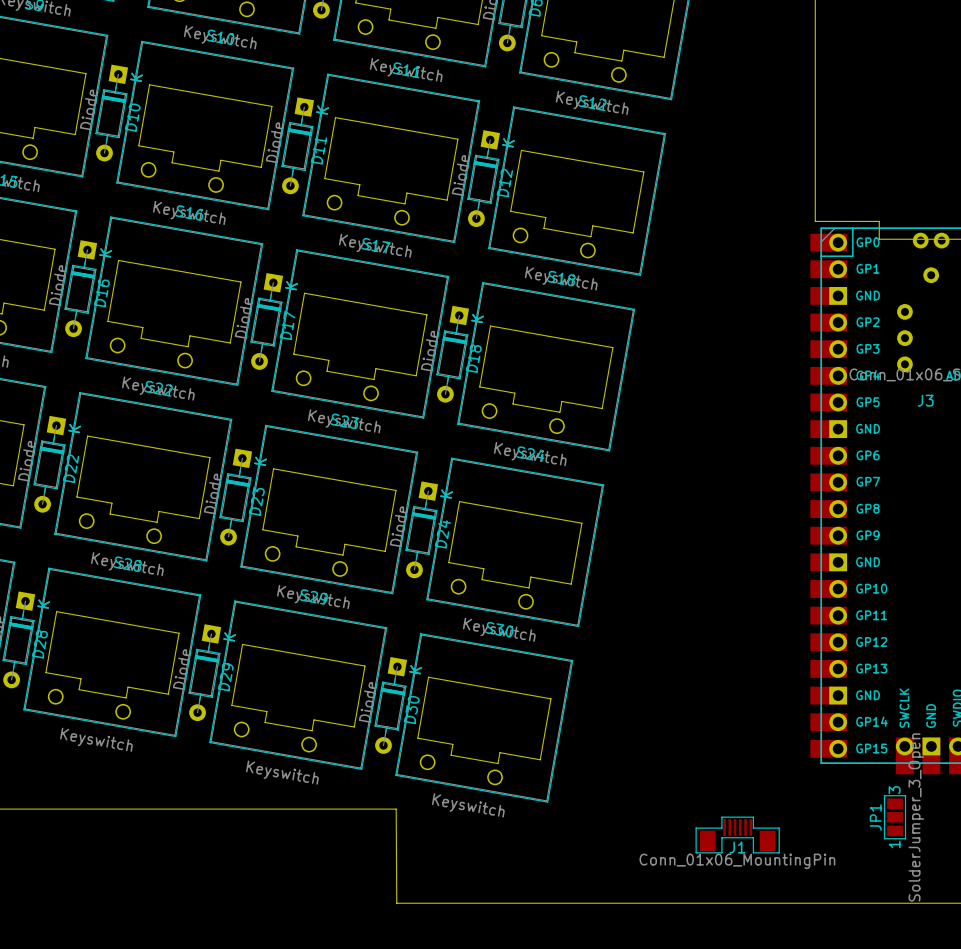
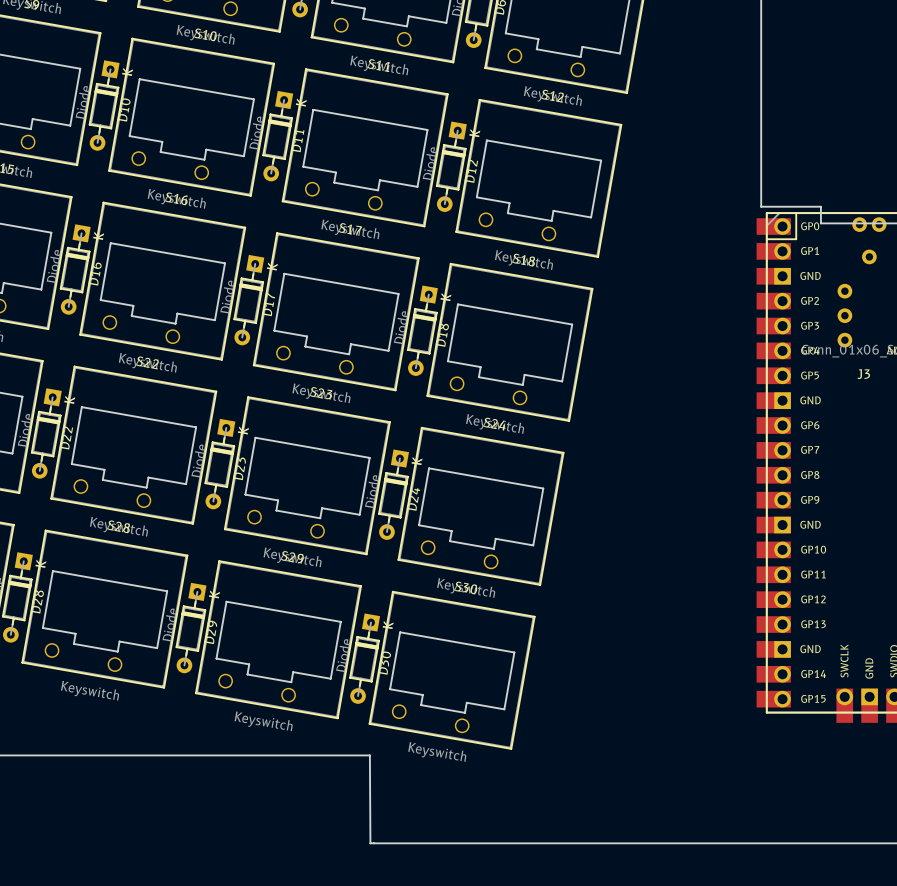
JP1: SolderJumper_3_Open (895, 817) -> none
J1: Conn_01x06_MountingPin (737, 835) -> none

